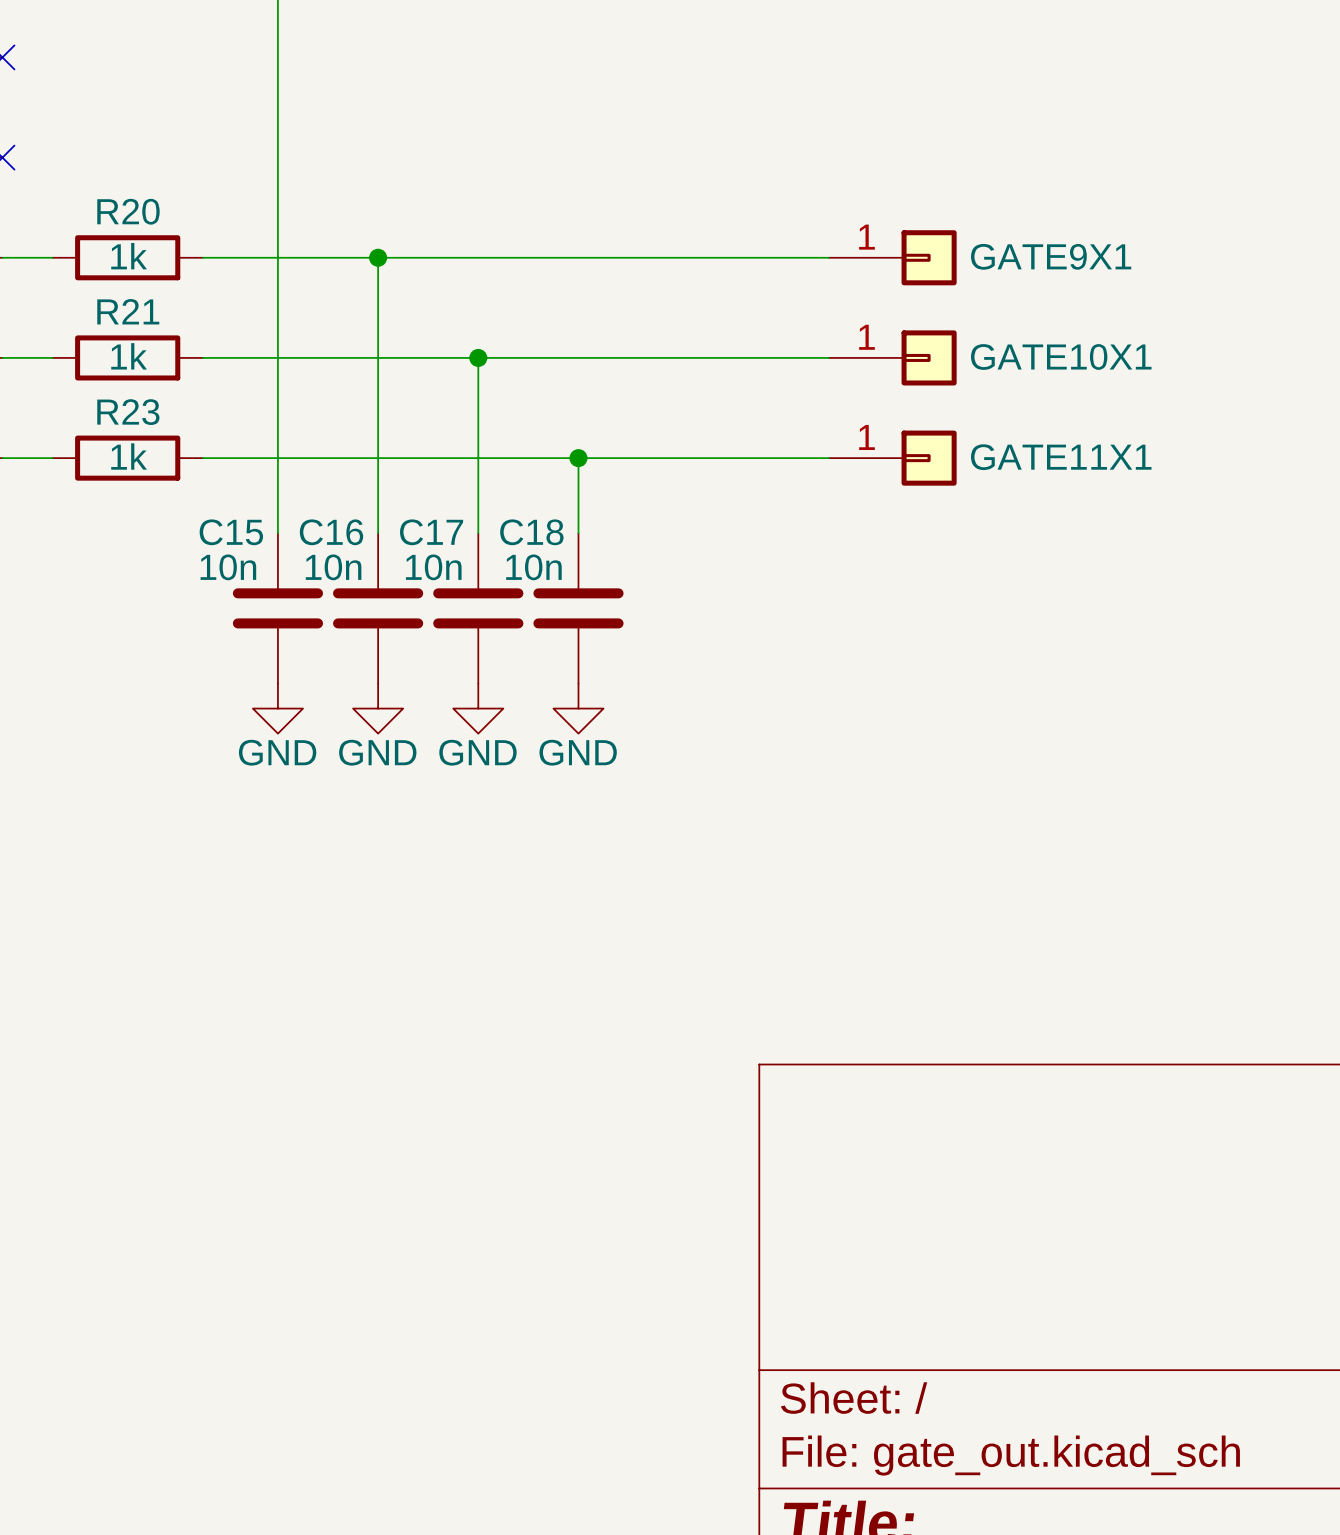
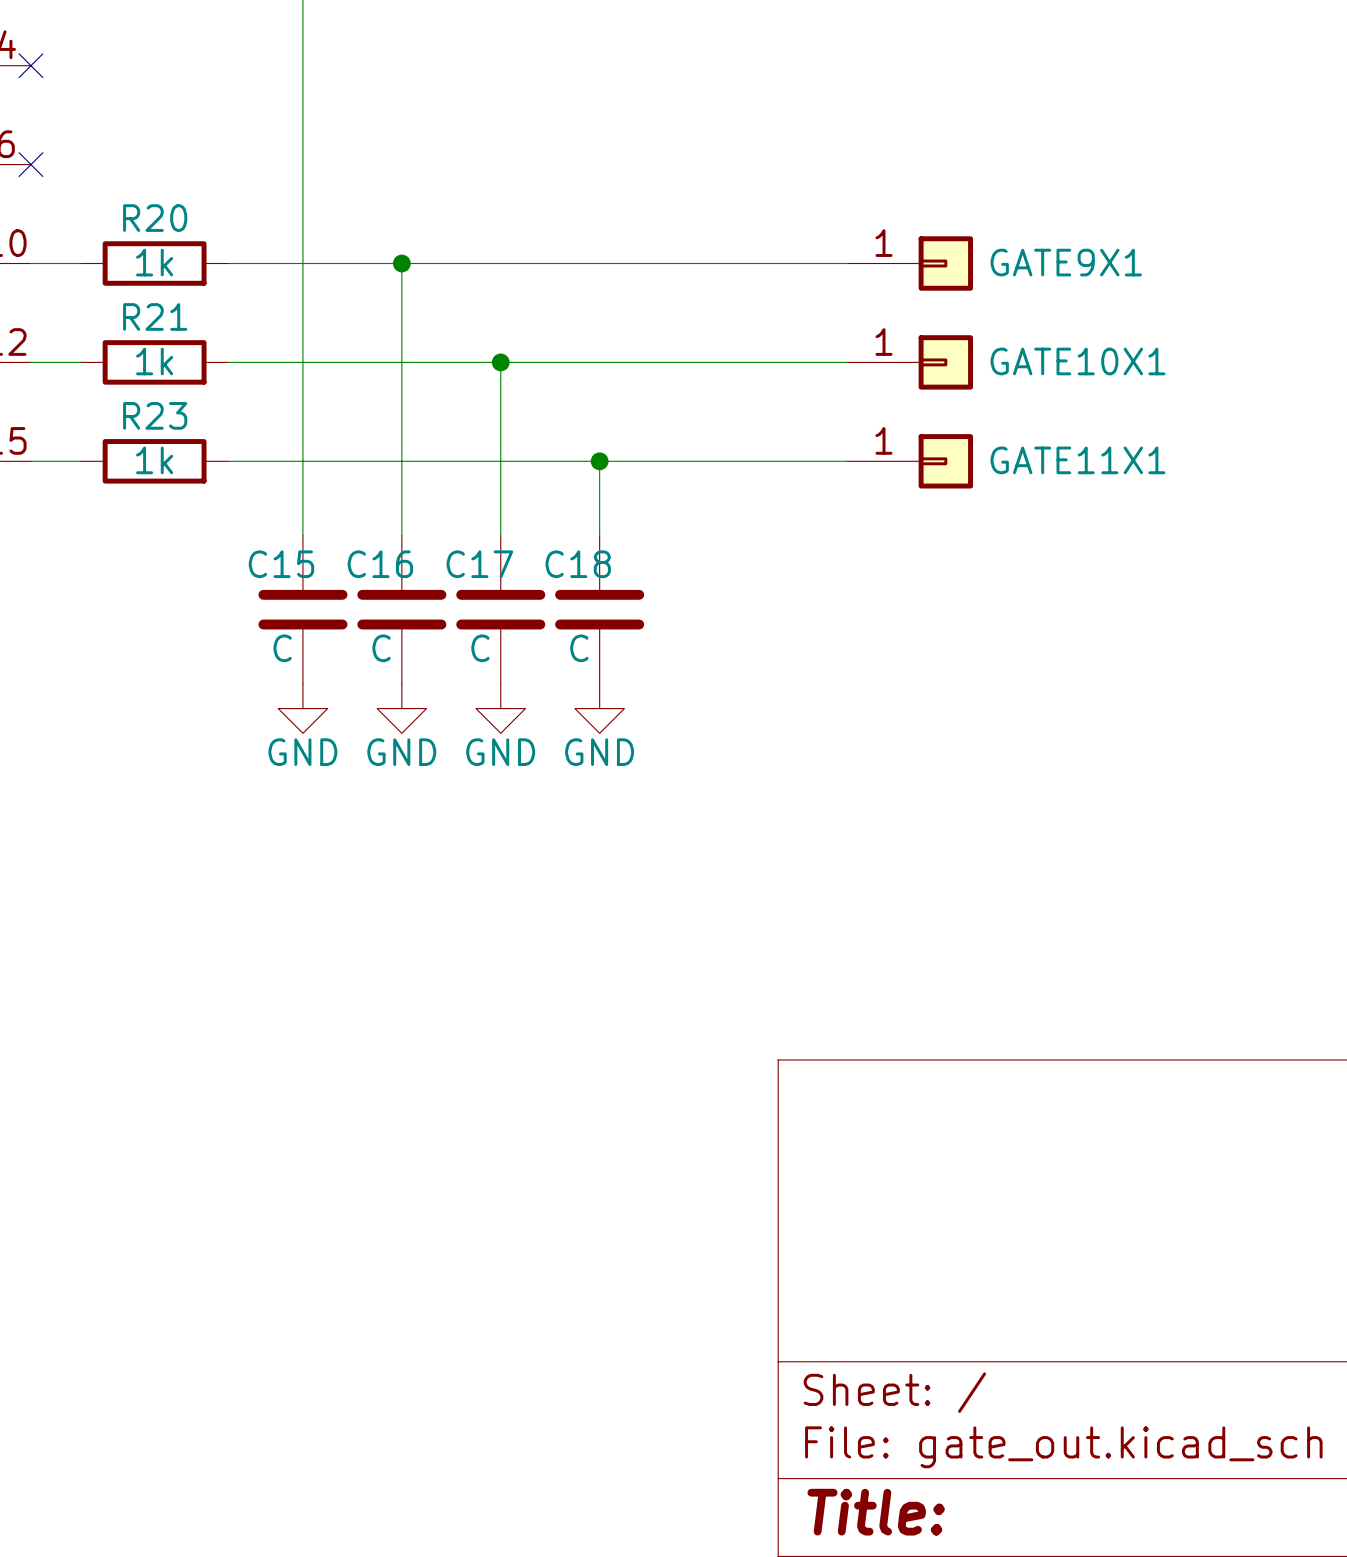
C15 name position: C15 (231, 532) -> C15 (281, 564)
C16 name position: C16 (331, 532) -> C16 (380, 564)
C17 name position: C17 (431, 532) -> C17 (479, 564)
C18 name position: C18 (531, 532) -> C18 (578, 564)
C15 value: 10n (228, 567) -> C (282, 648)
C16 value: 10n (333, 567) -> C (381, 648)
C17 value: 10n (433, 567) -> C (480, 648)
C18 value: 10n (533, 567) -> C (579, 648)

